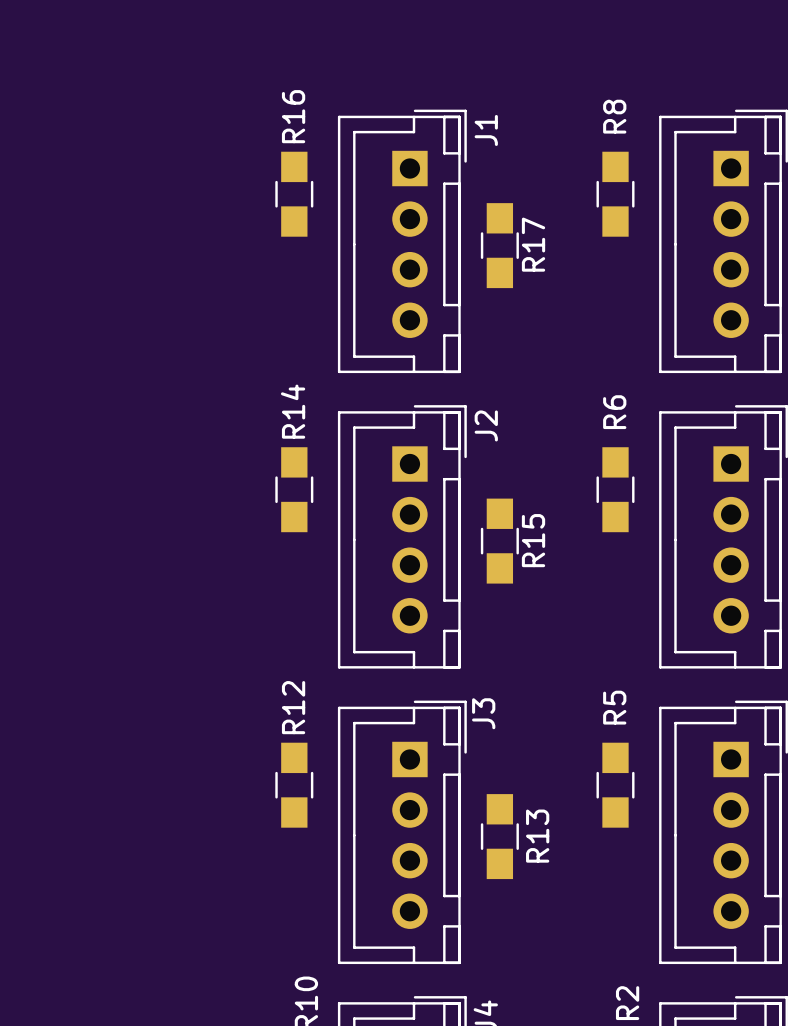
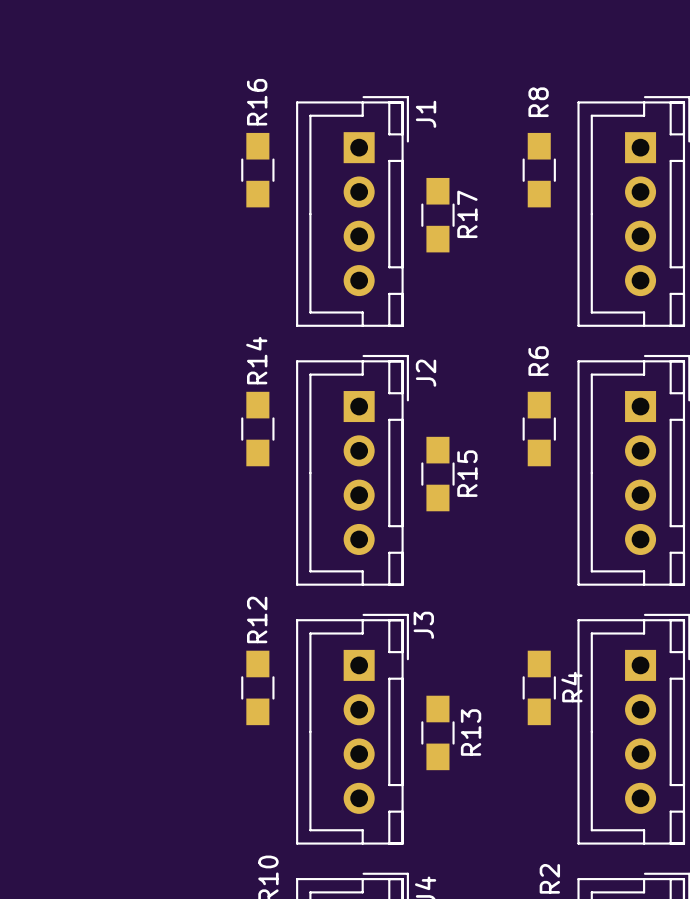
R5 name: R5 (614, 707) -> R4 (571, 687)

